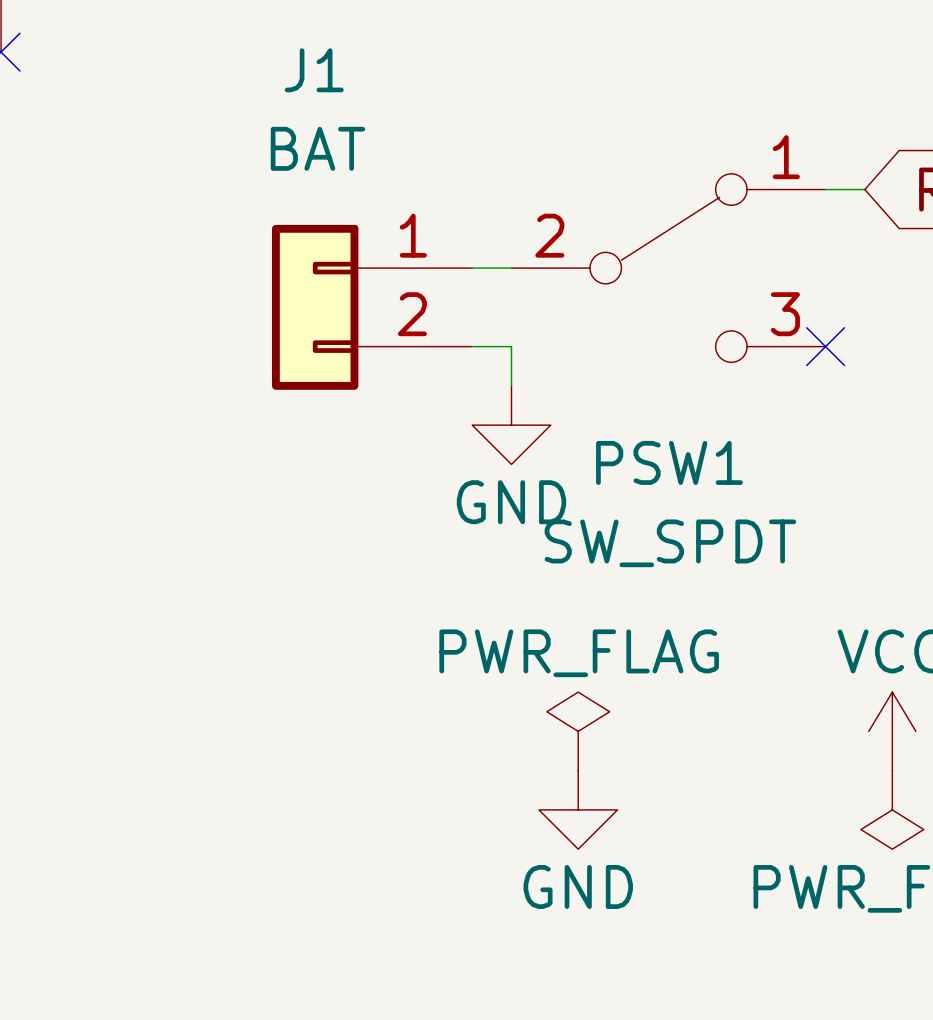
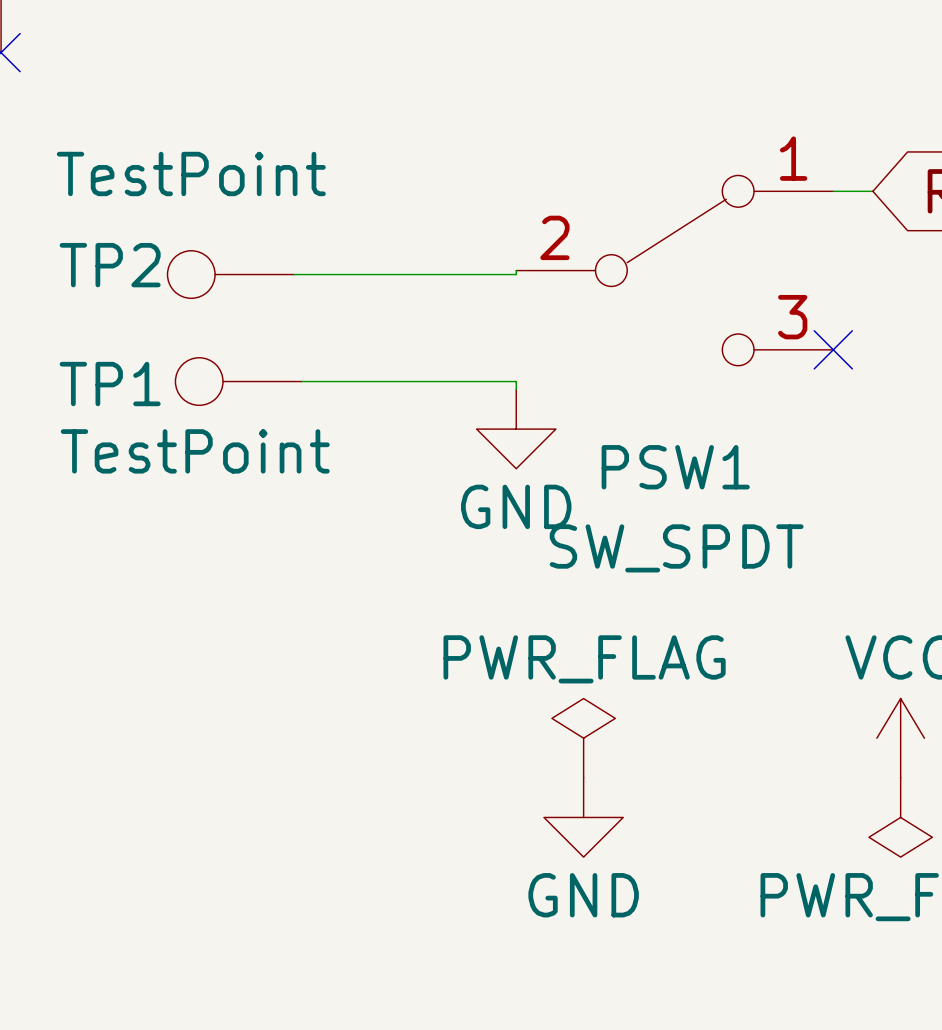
wire: (472, 268) (511, 268) -> (294, 274) (516, 274) (516, 270)
TP2: none -> TestPoint (230, 274)
J1: BAT (372, 307) -> none
wire: (472, 346) (511, 346) (511, 378) -> (302, 381) (516, 381)
TP1: none -> TestPoint (238, 381)

